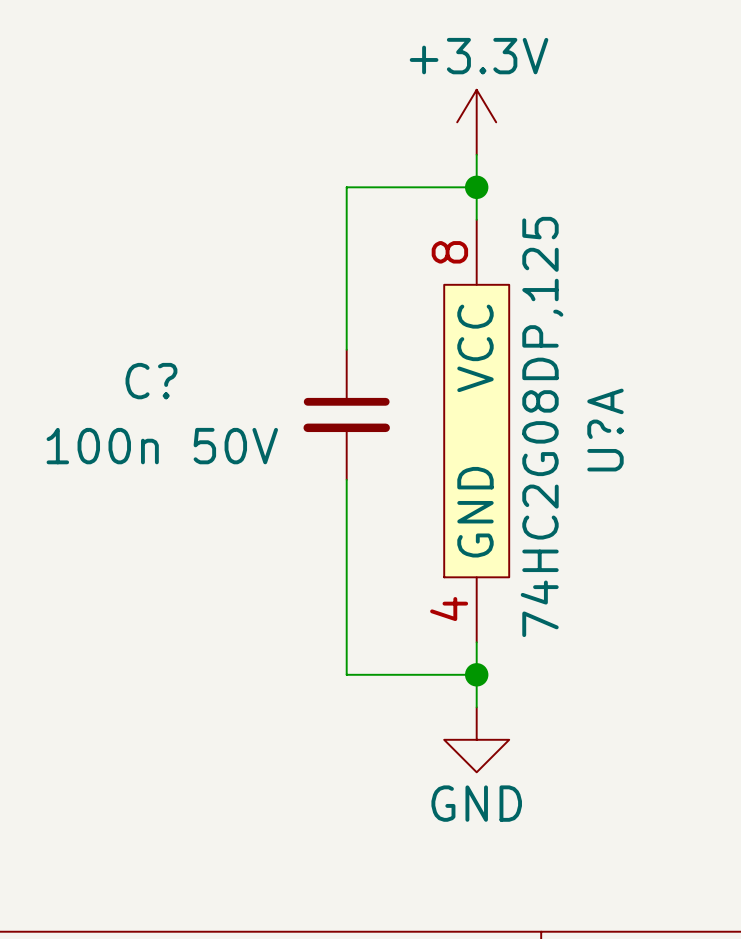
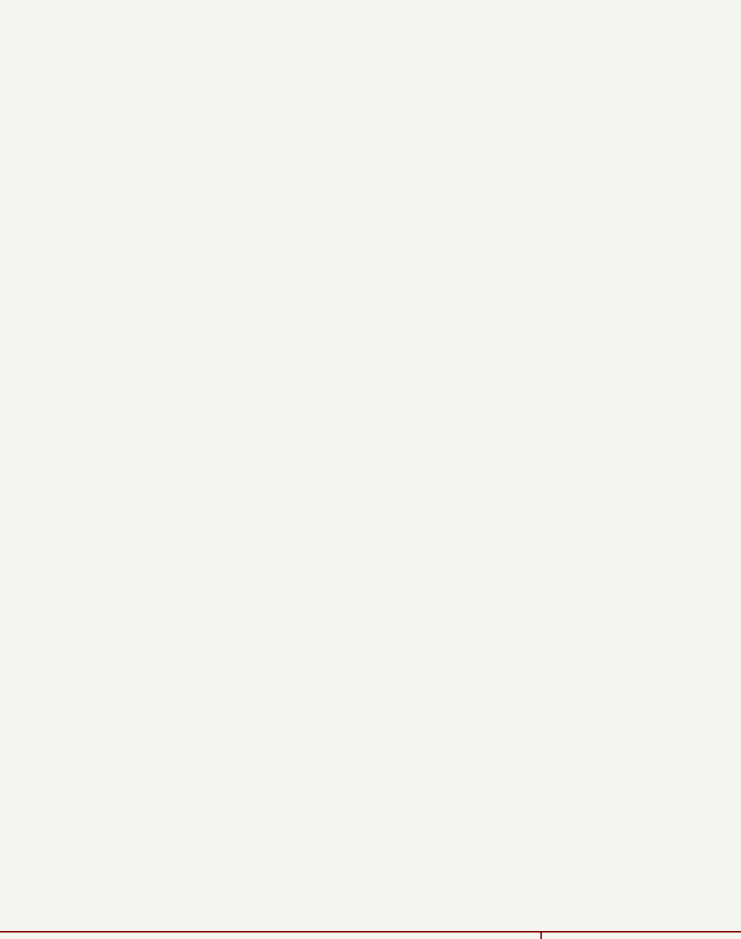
power symbol: +3.3V (476, 122) -> none
wire: (476, 154) (476, 219) -> none
wire: (476, 187) (346, 187) (346, 349) -> none
junction: (476, 187) -> none
C?: 100n 50V (346, 414) -> none
U?A: 74HC2G08DP,125 (476, 431) -> none
wire: (346, 479) (346, 674) (476, 674) -> none
wire: (476, 642) (476, 707) -> none
junction: (476, 674) -> none
power symbol: GND (476, 739) -> none

